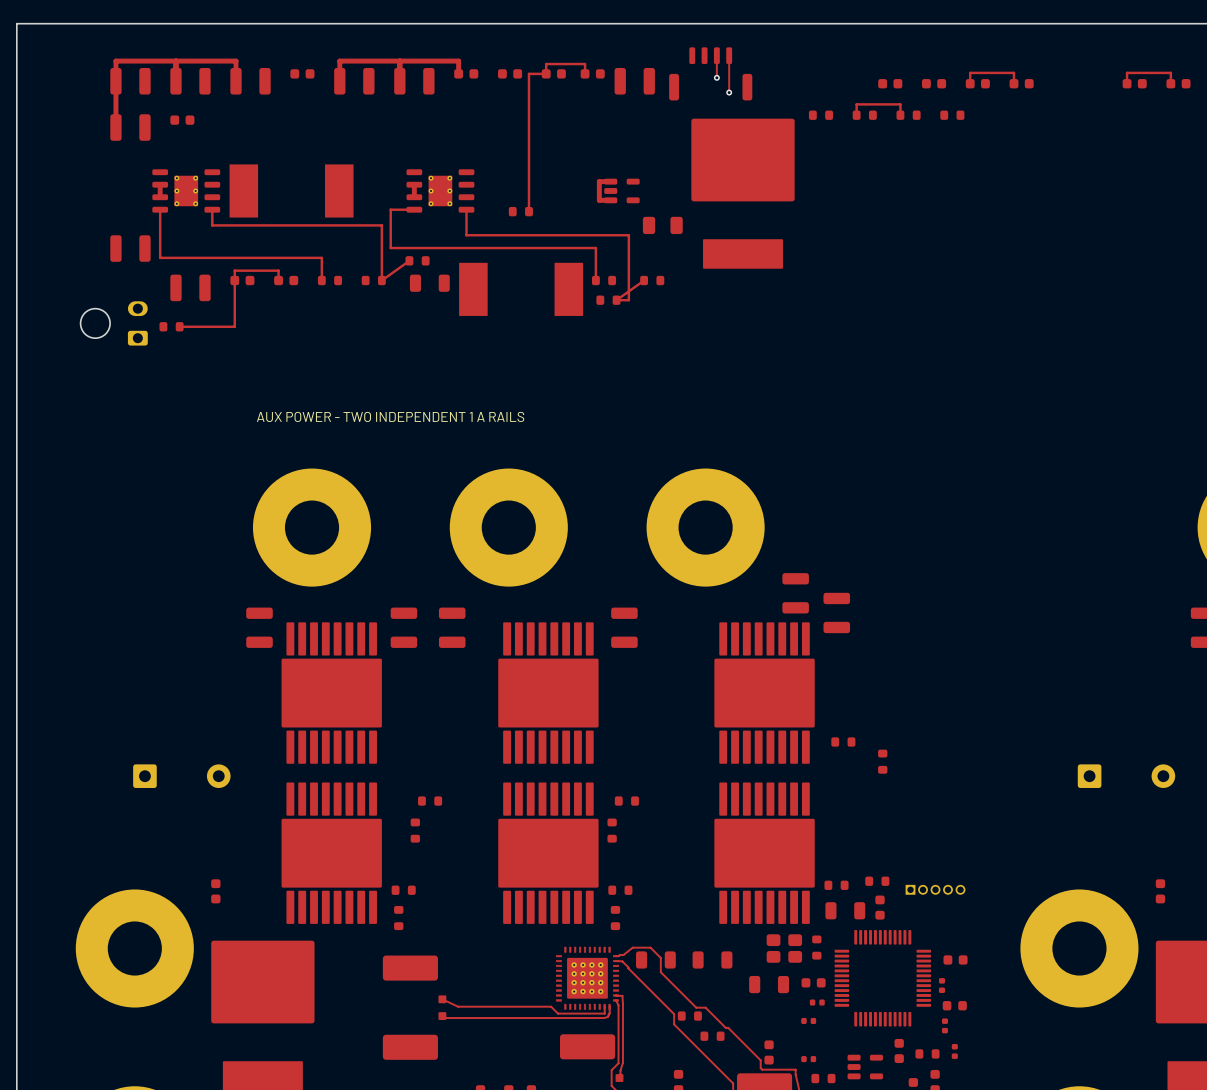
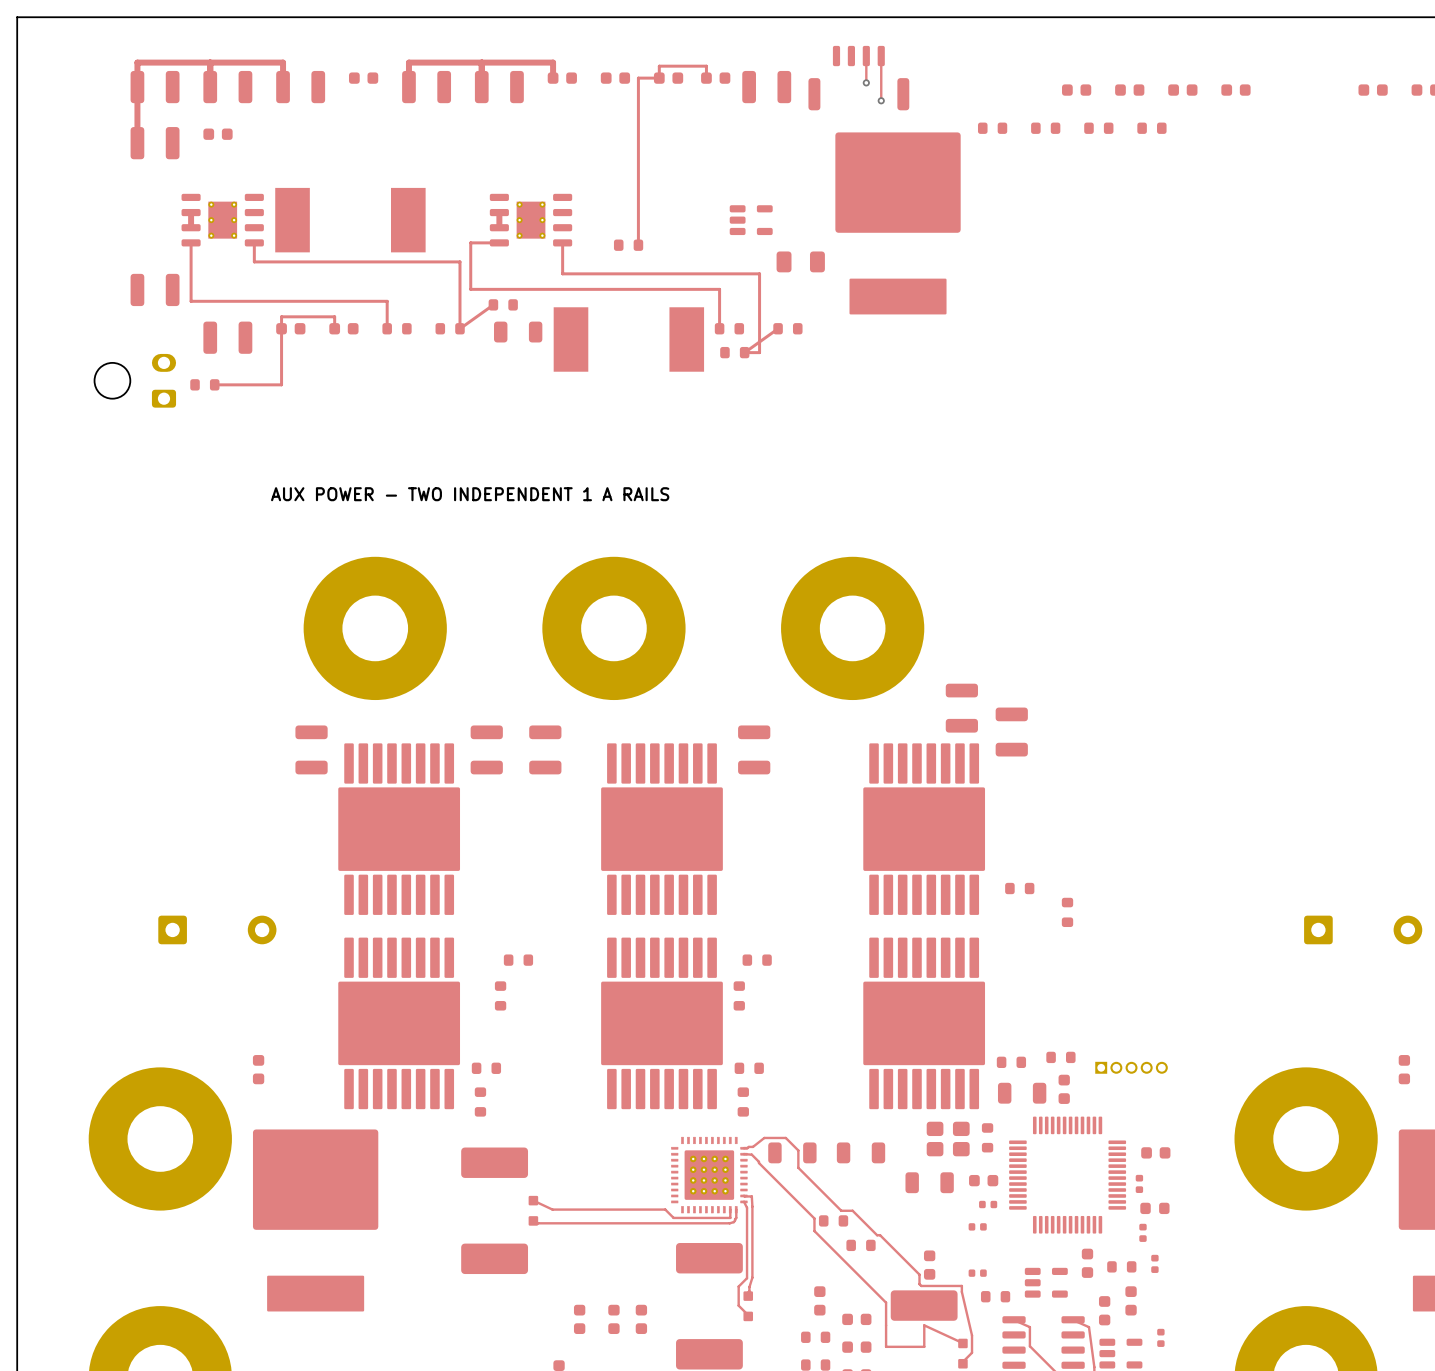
track: (970, 83) (970, 72) (1013, 72) (1013, 83) -> none
track: (1127, 83) (1127, 72) (1170, 72) (1170, 83) -> none
track: (856, 115) (856, 104) (900, 104) (900, 115) -> none
track: (610, 181) (599, 181) (599, 200) (610, 200) -> none

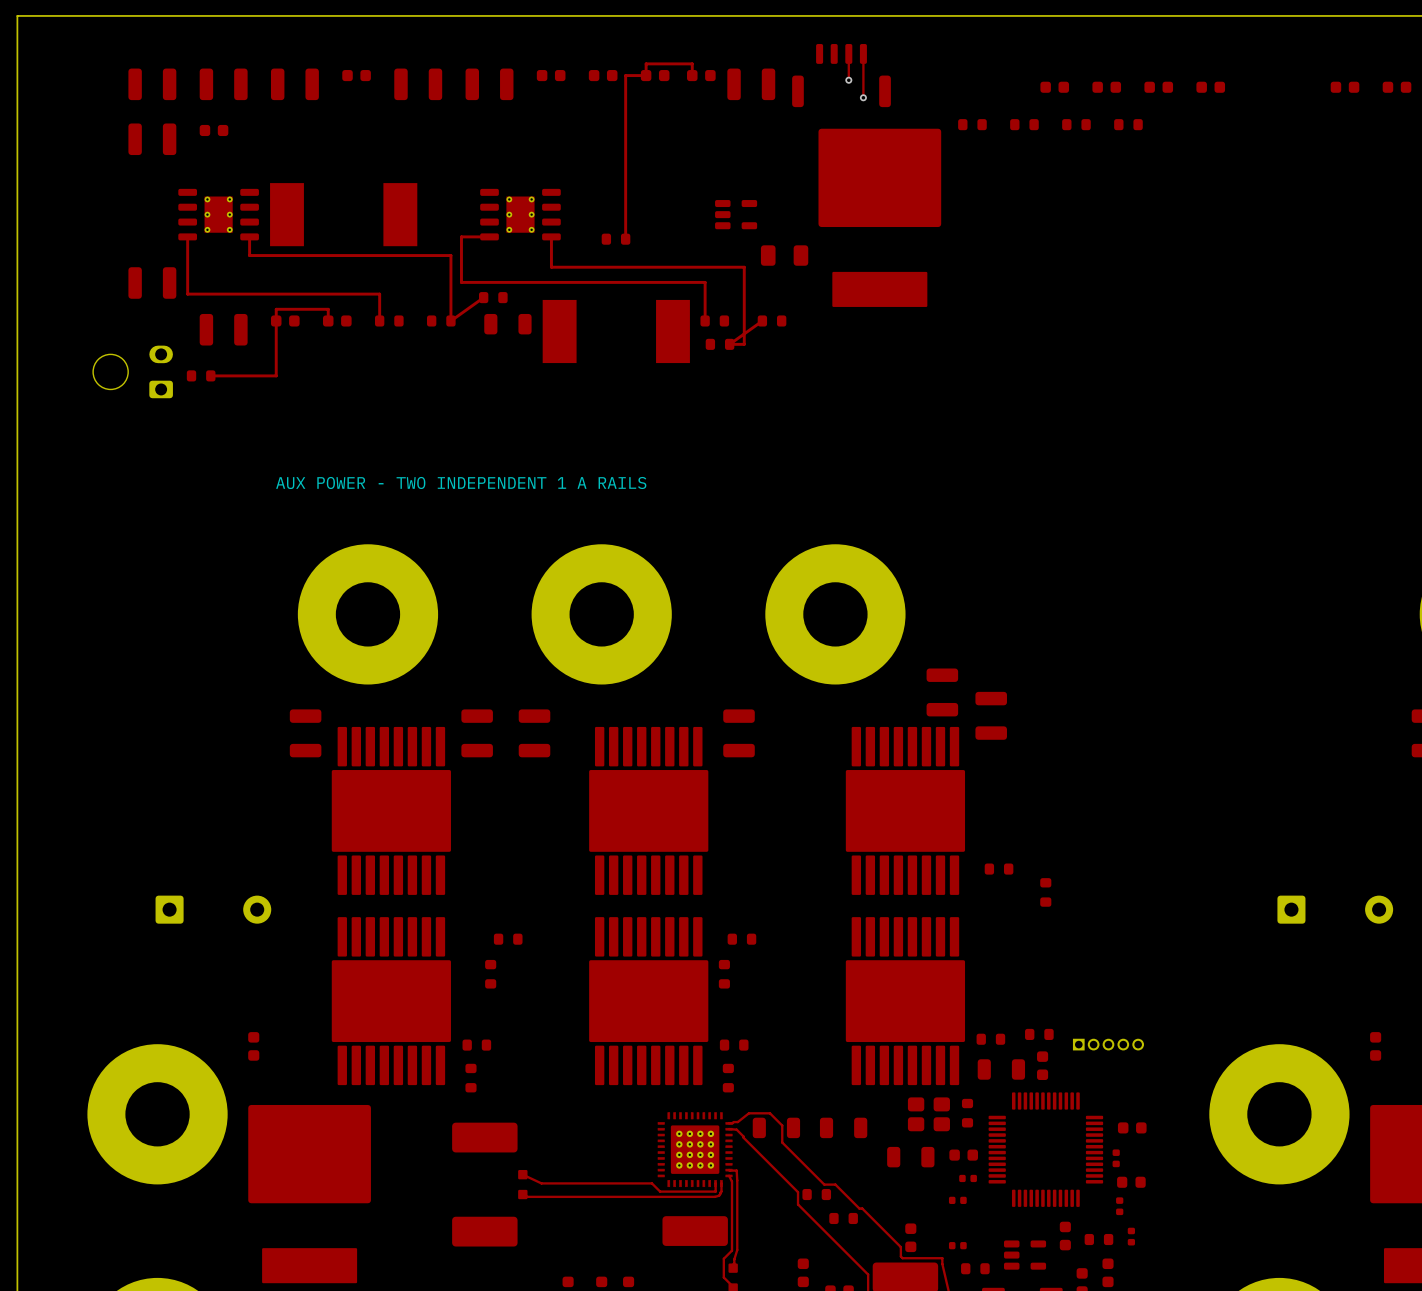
track: (553, 78) (553, 62) (408, 62) (408, 87) -> none
track: (283, 87) (283, 62) (137, 62) (137, 143) -> none
track: (191, 212) (191, 227) -> none
track: (499, 212) (499, 227) -> none

